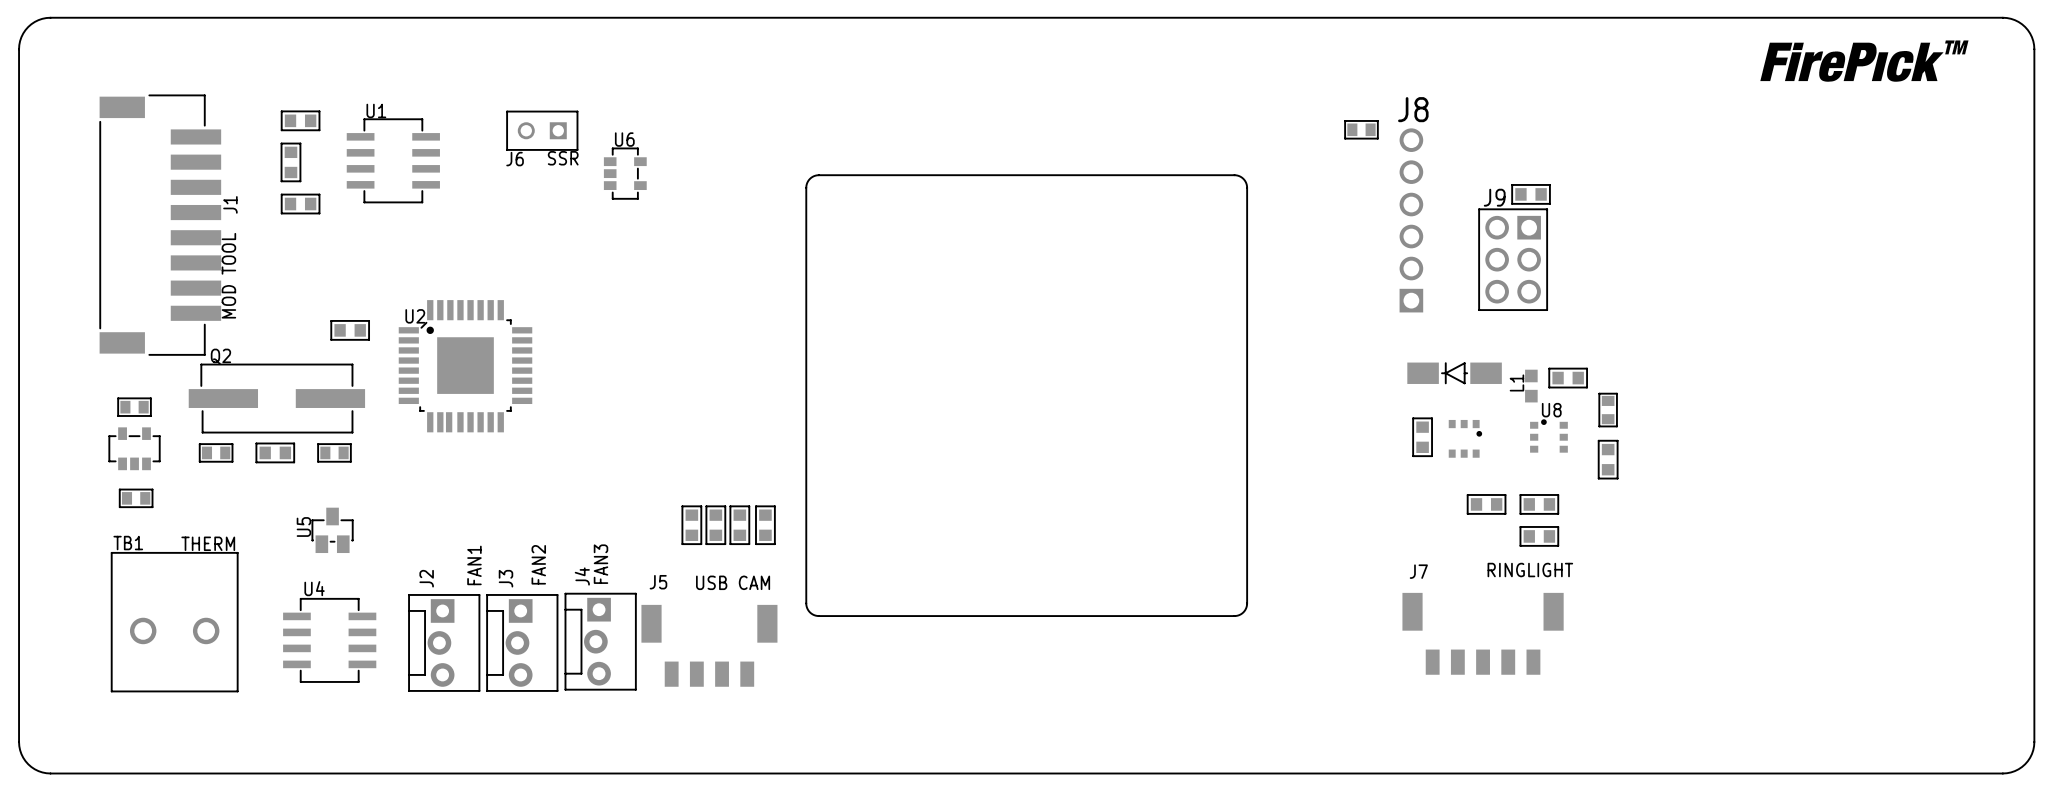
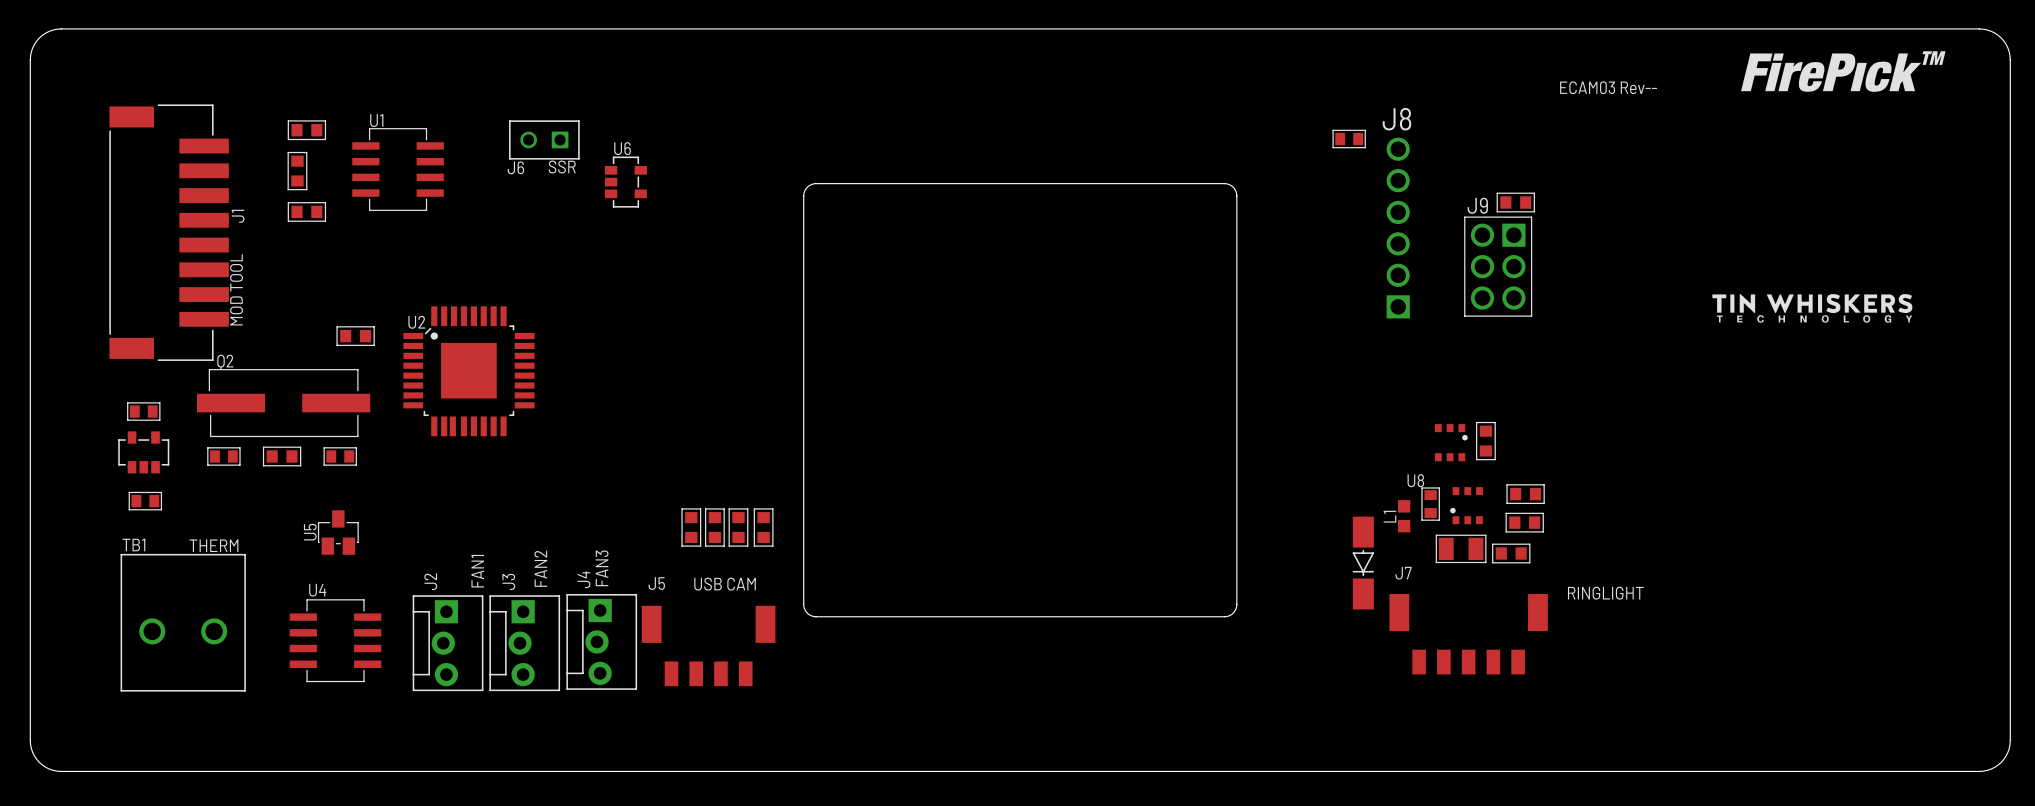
text: none -> ECAM03 Rev-- (1608, 87)
drawing: none -> [1712, 294, 1913, 323]
part rotation: 0° (1454, 373) -> 90° counterclockwise (1363, 563)
part position: (1454, 373) -> (1363, 563)
part: (1568, 378) -> none
L1 position: (1531, 386) -> (1404, 516)
U8 name position: U8 (1551, 410) -> U8 (1415, 480)
part position: (1608, 410) -> (1430, 504)
U8 rotation: 0° (1548, 435) -> 90° counterclockwise (1466, 505)
U8 position: (1548, 435) -> (1466, 505)
part: (1422, 437) -> none
part: none -> (1485, 441)
part: (1608, 459) -> none
part: none -> (1525, 494)
part: (1486, 504) -> none
part: (1539, 504) -> none
part: none -> (1524, 522)
part: (1539, 536) -> none
part: none -> (1461, 548)
part: none -> (1511, 553)
text position: RINGLIGHT (1530, 570) -> RINGLIGHT (1605, 593)

